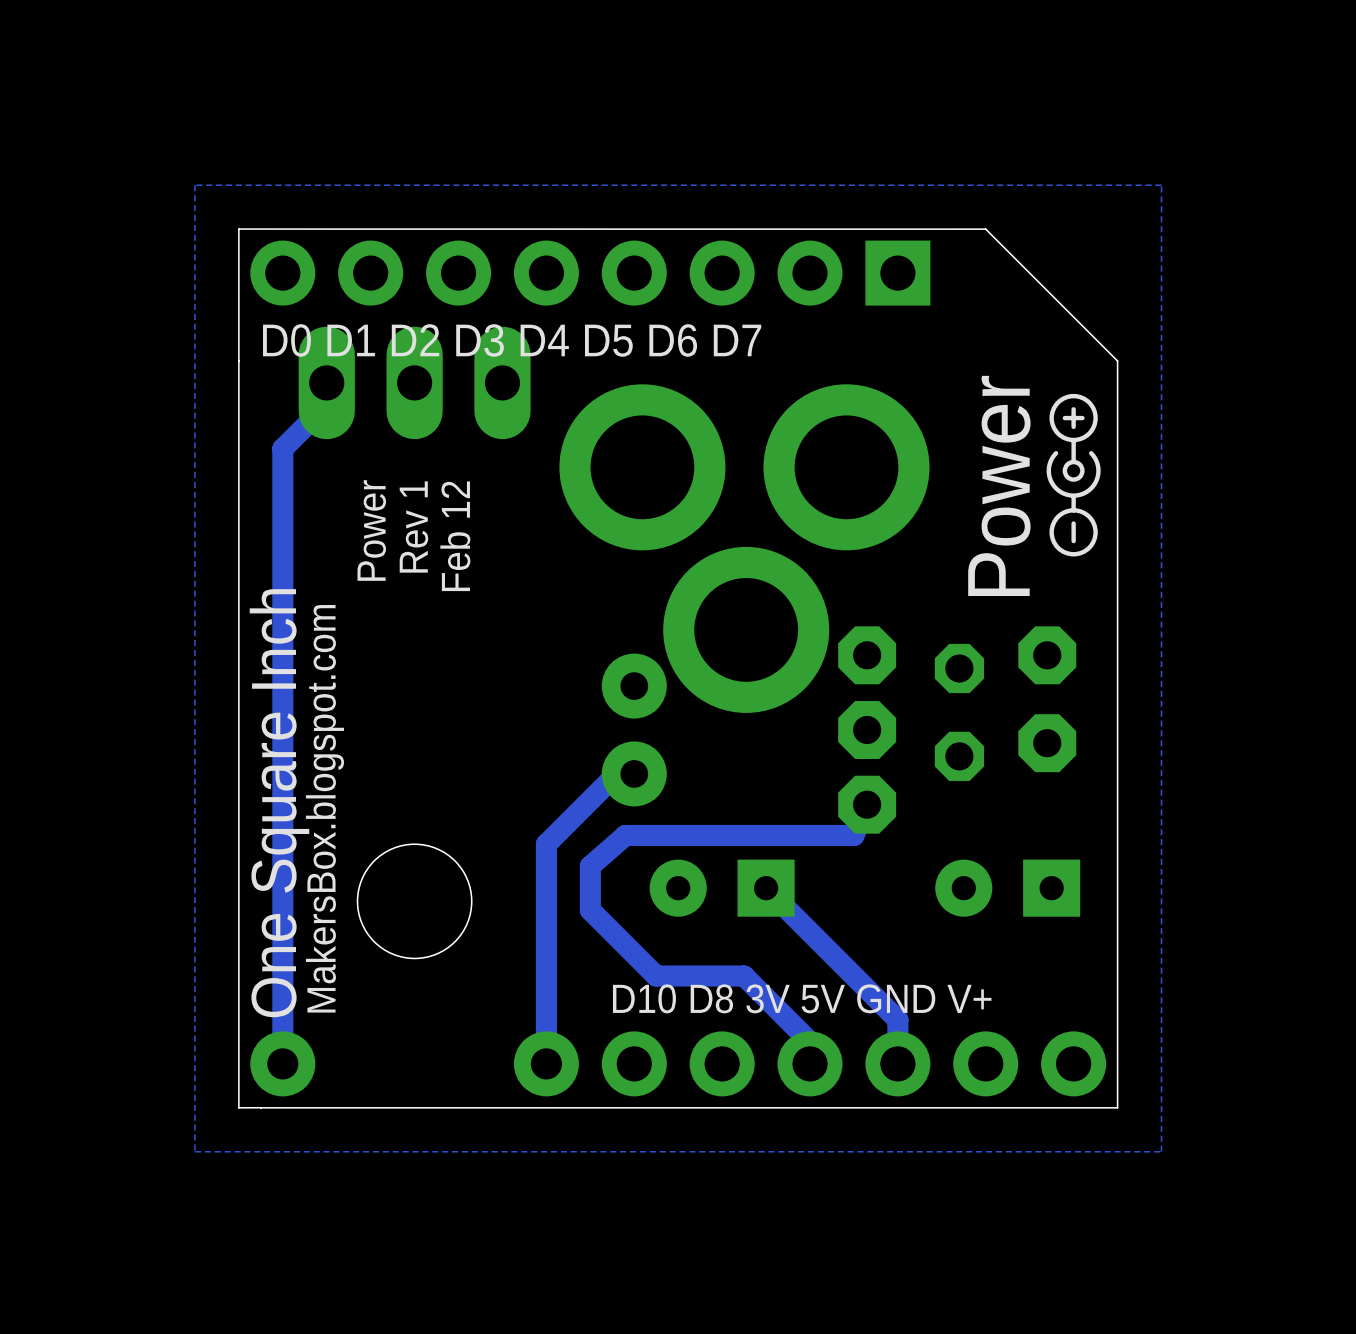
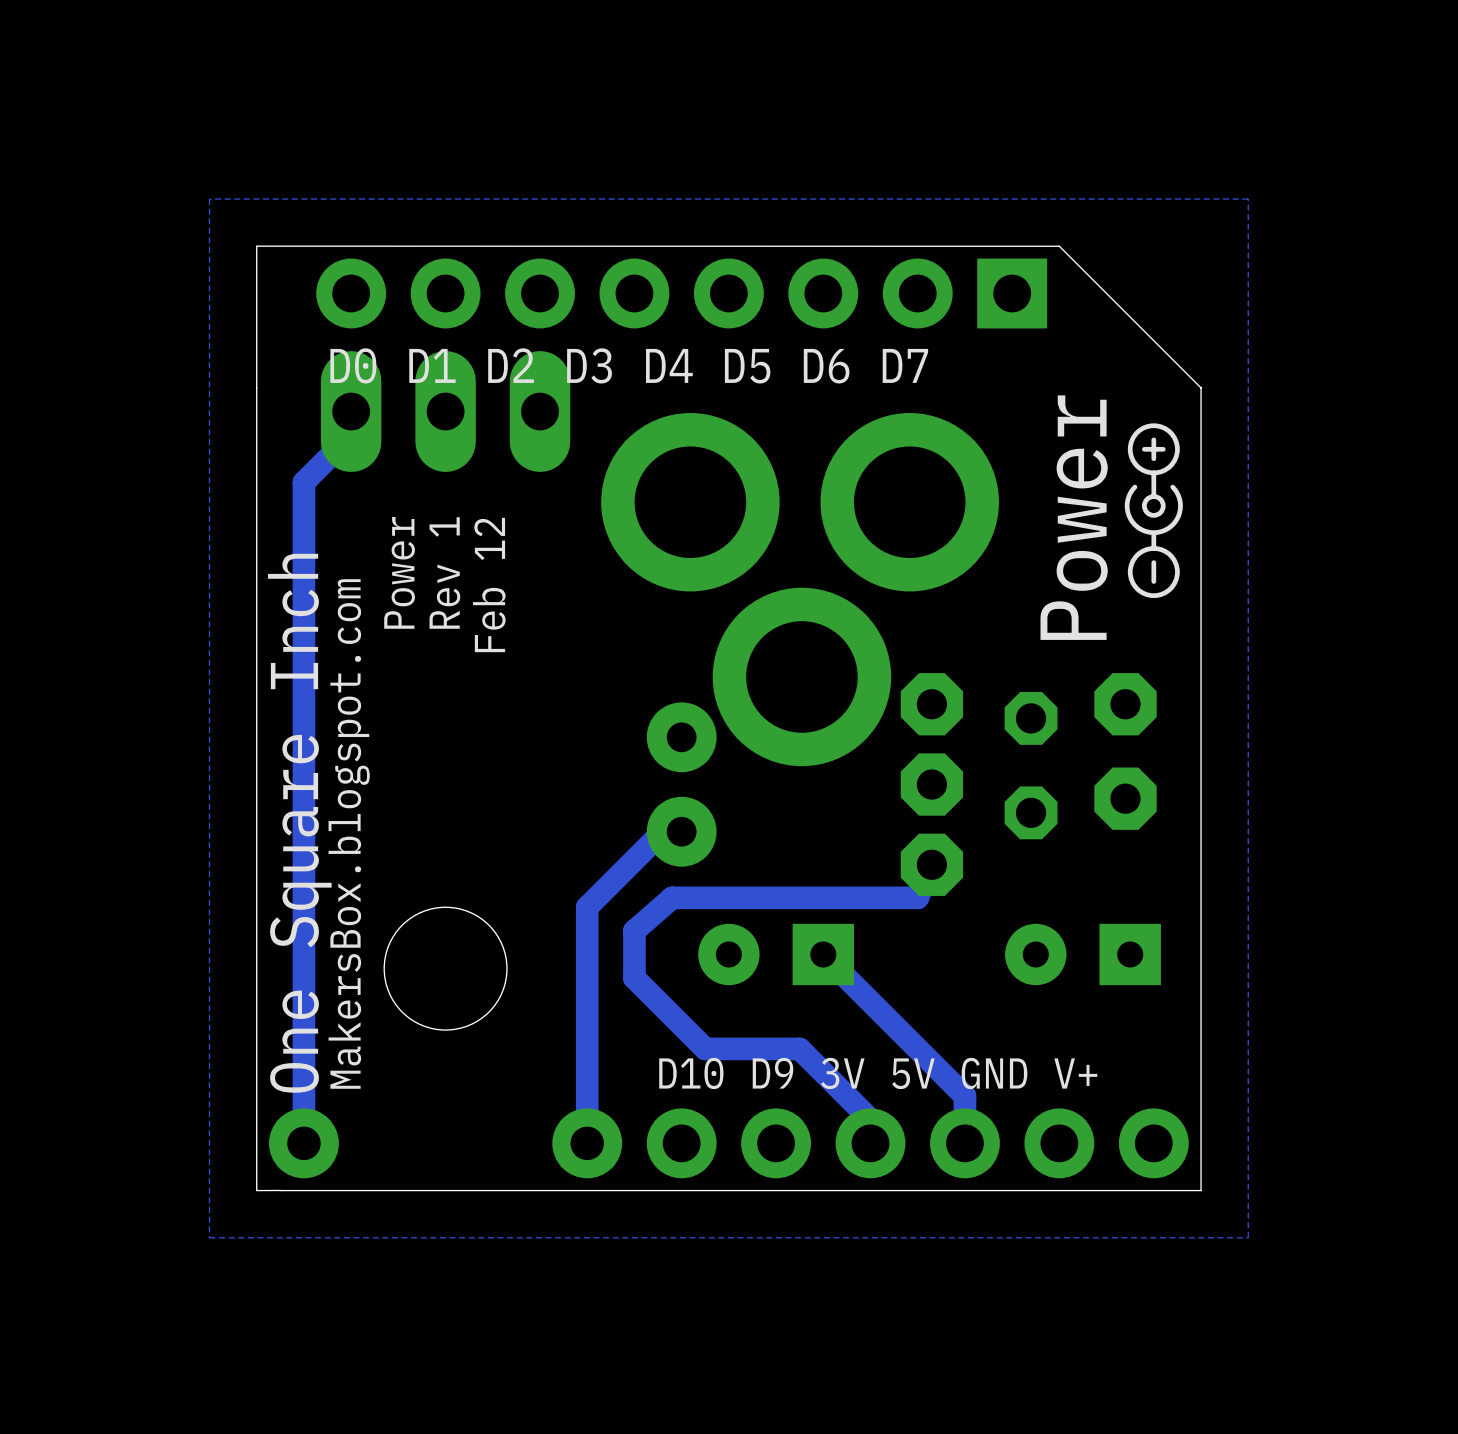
part position: (590, 273) -> (681, 293)
text position: D0 D1 D2 D3 D4 D5 D6 D7 (512, 340) -> D0 D1 D2 D3 D4 D5 D6 D7 (629, 365)
text: D10 D8 3V 5V GND V+ (802, 998) -> D10 D9 3V 5V GND V+ (878, 1073)

